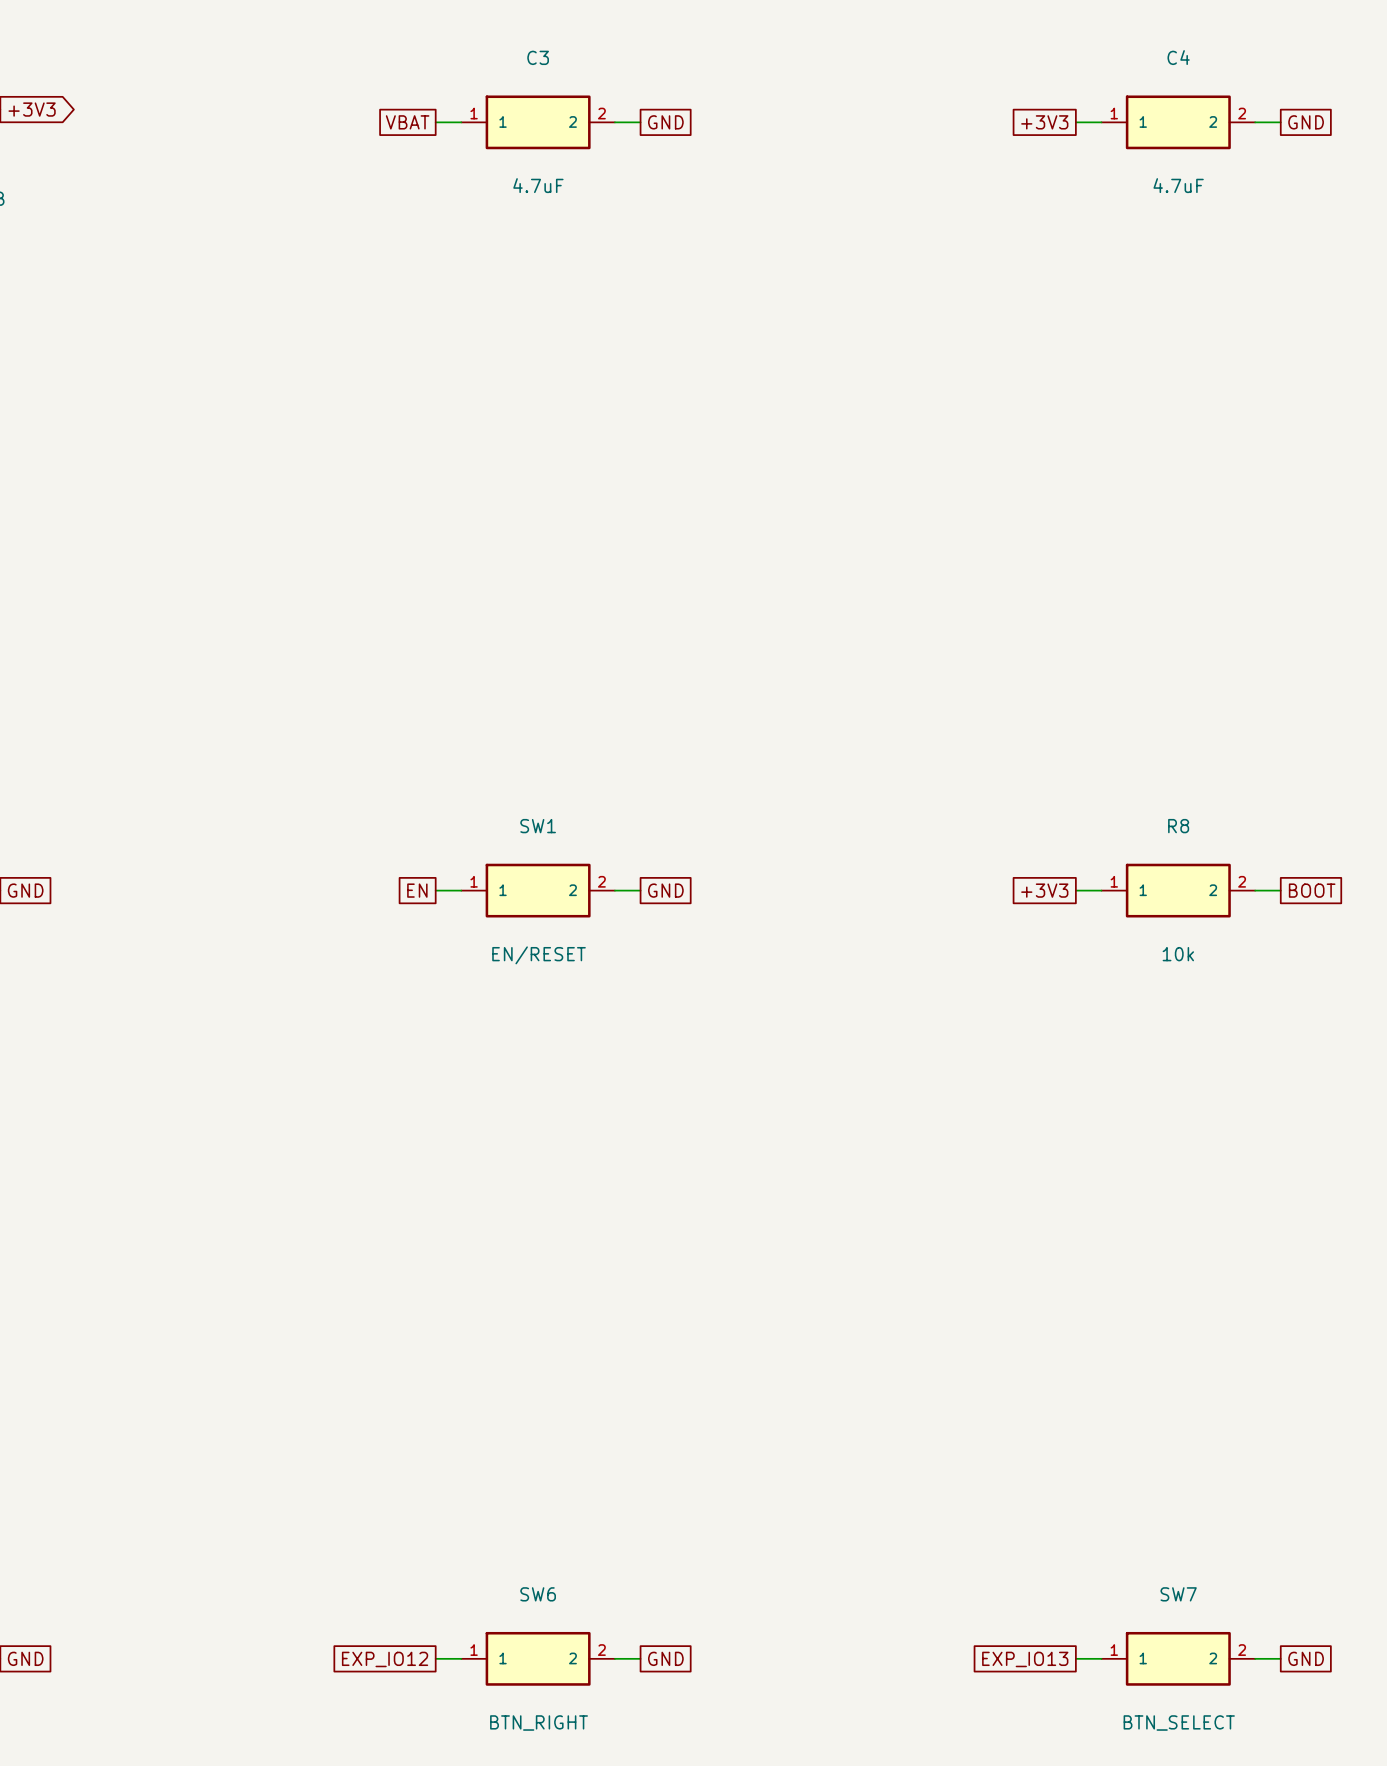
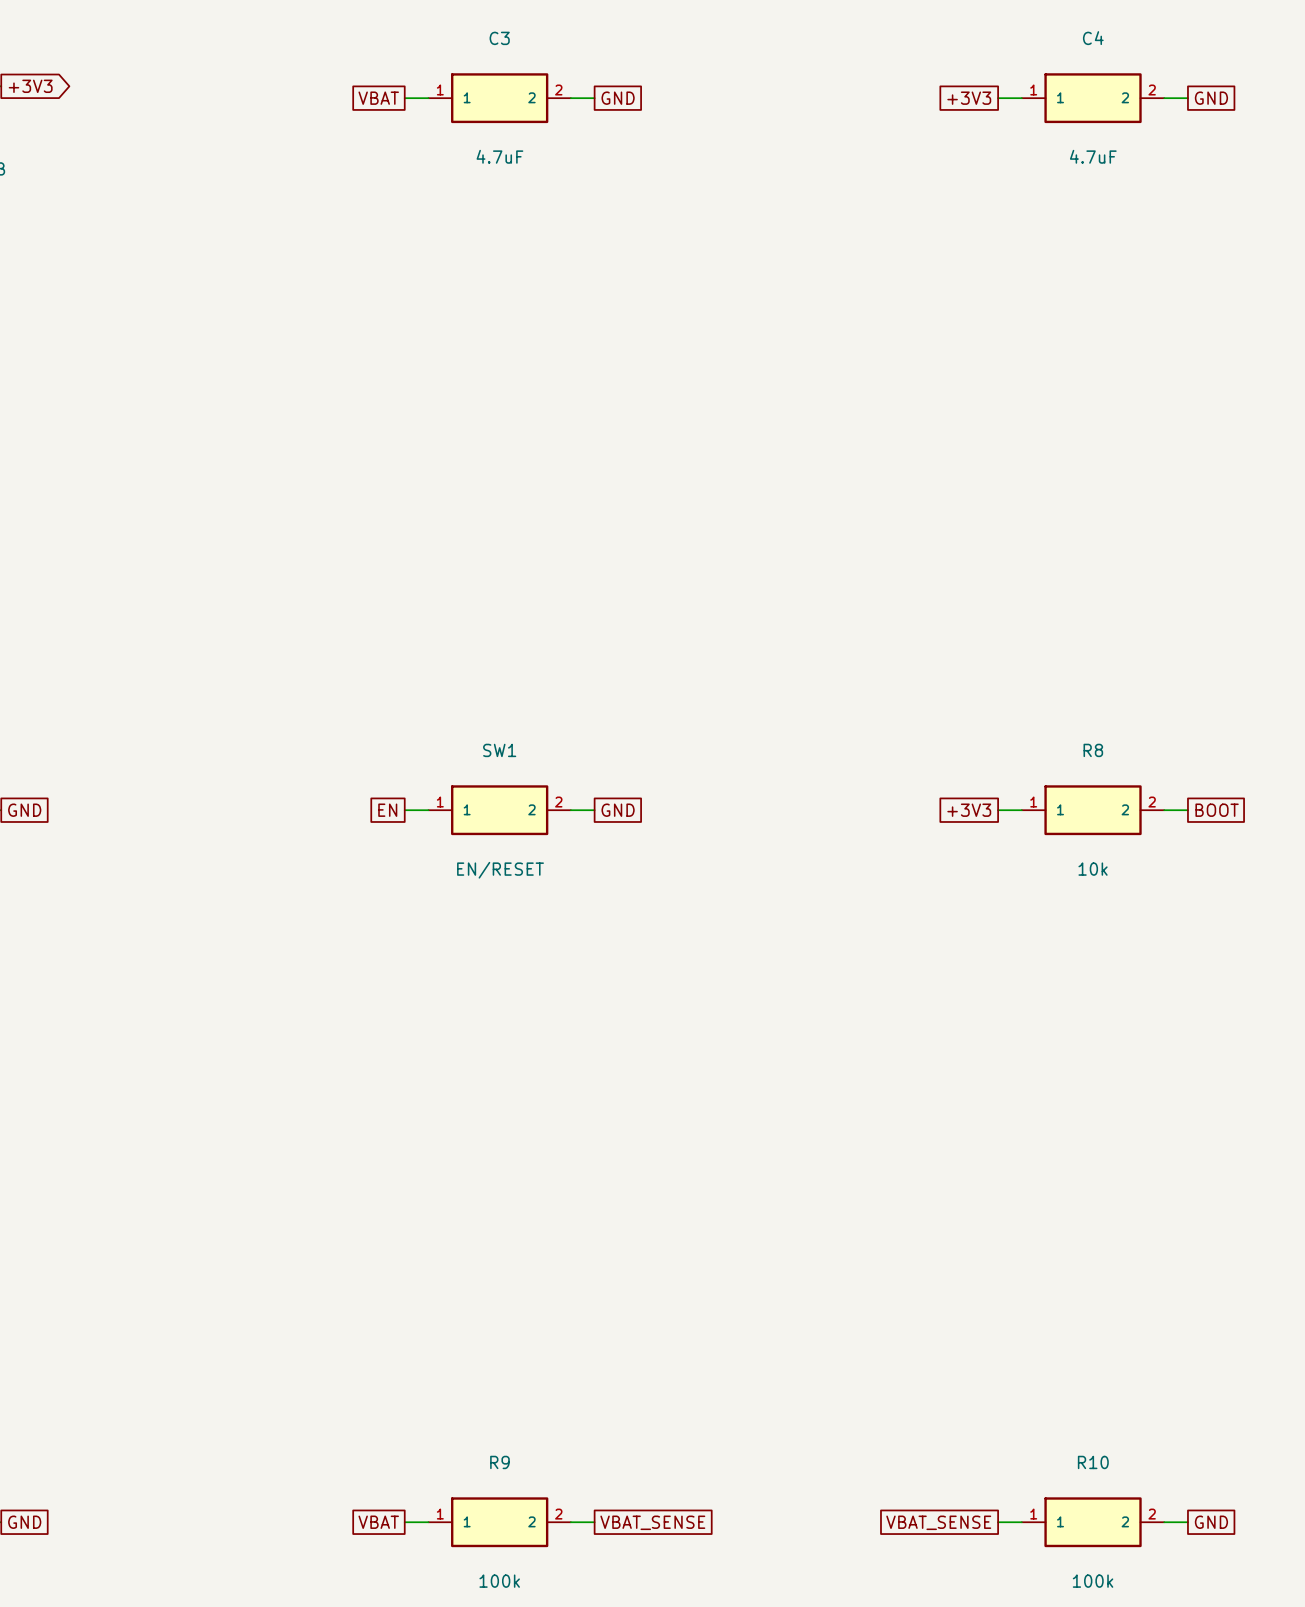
SW6 name: SW6 (538, 1594) -> R9 (499, 1462)
SW7 name: SW7 (1178, 1594) -> R10 (1093, 1462)
global label: GND (665, 1658) -> VBAT_SENSE (652, 1522)
global label: EXP_IO12 (385, 1659) -> VBAT (378, 1522)
global label: EXP_IO13 (1025, 1659) -> VBAT_SENSE (938, 1522)
SW6 value: BTN_RIGHT (539, 1723) -> 100k (499, 1581)
SW7 value: BTN_SELECT (1179, 1723) -> 100k (1093, 1581)

